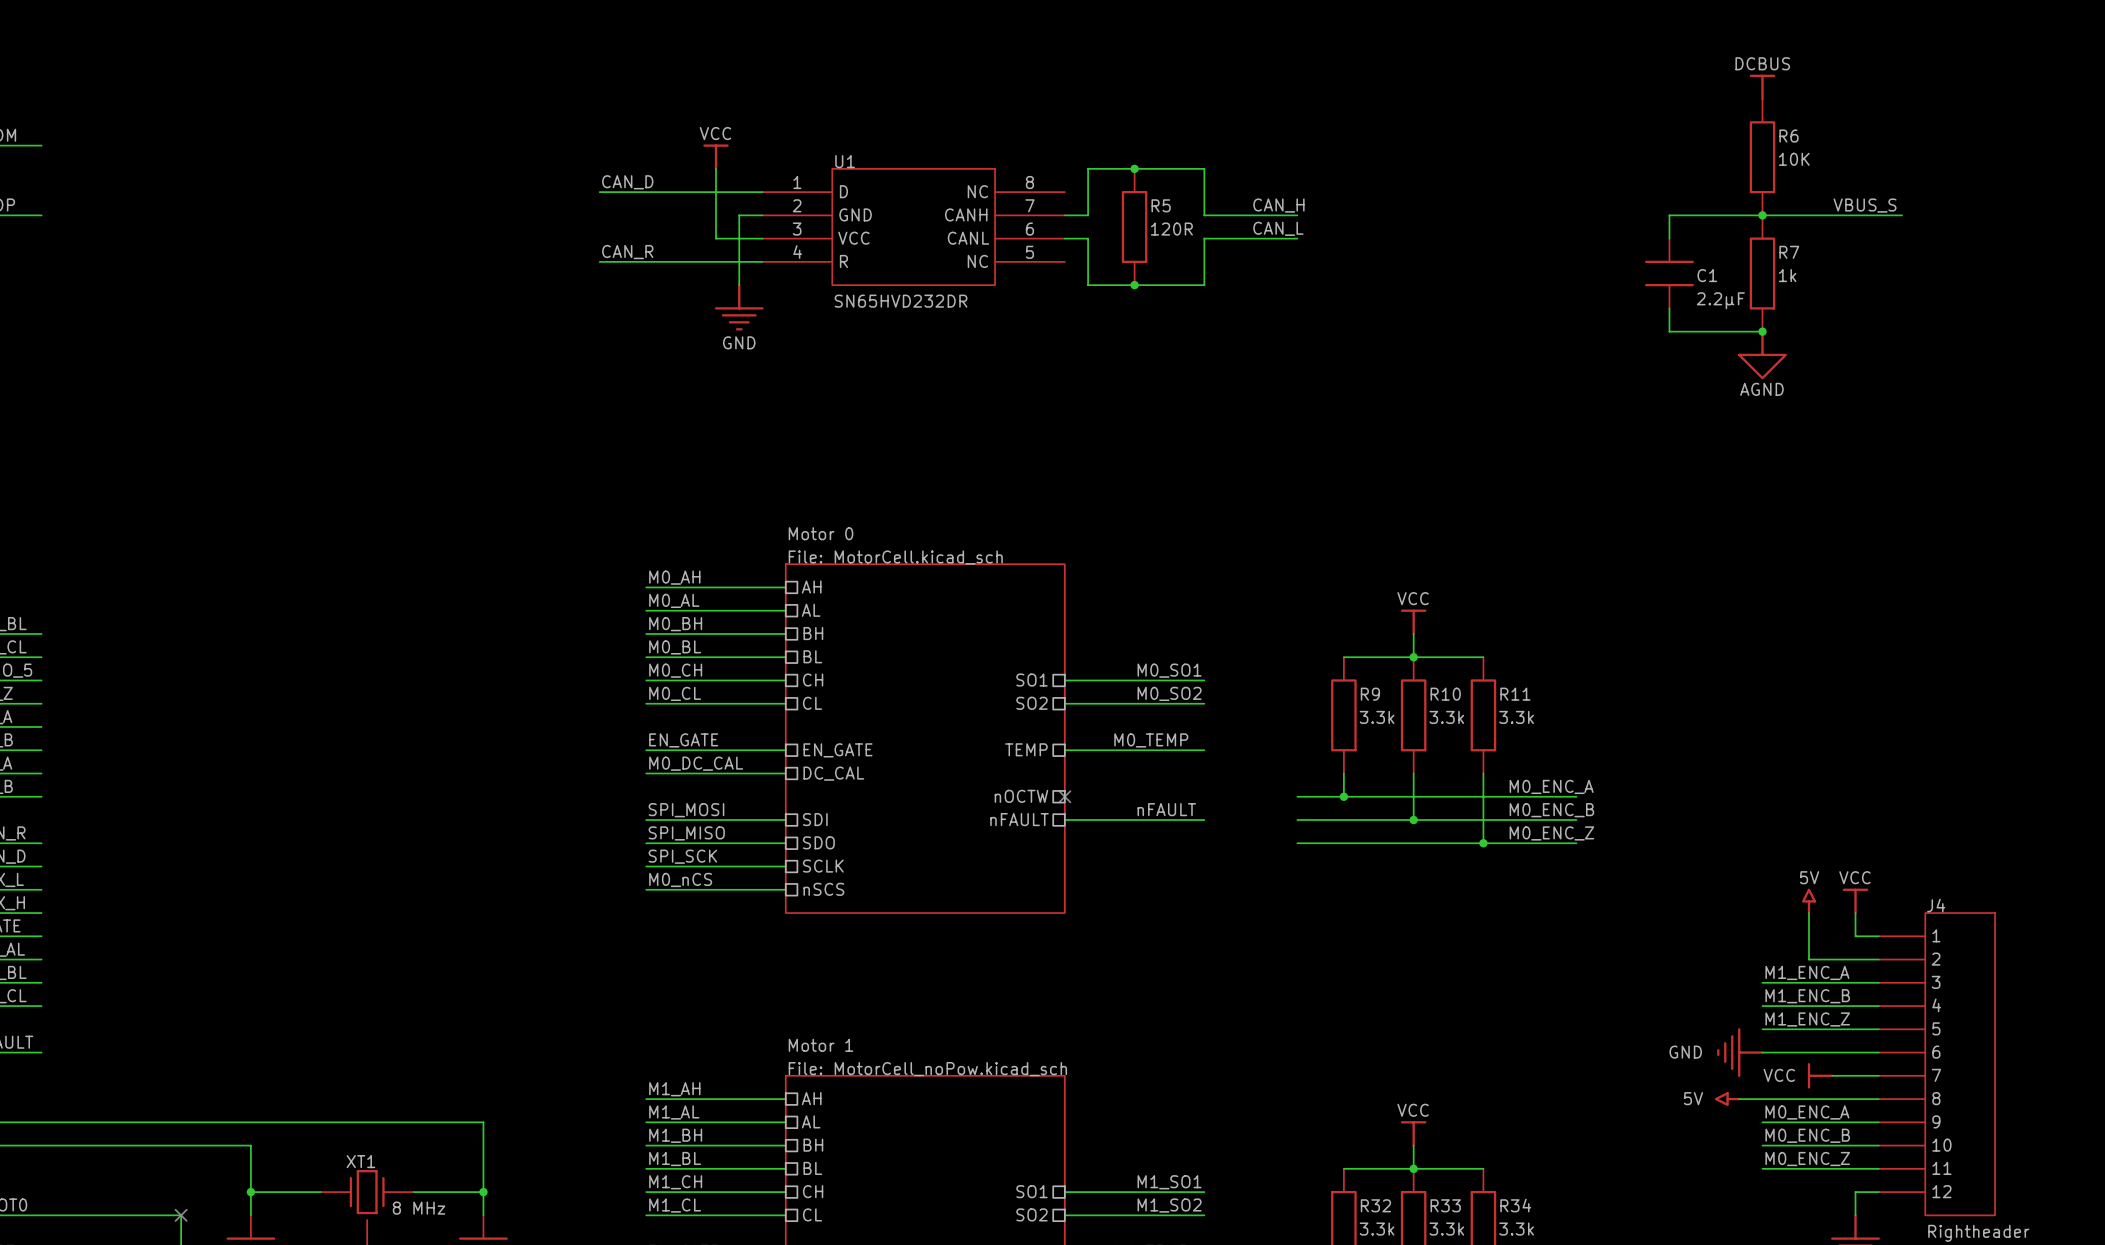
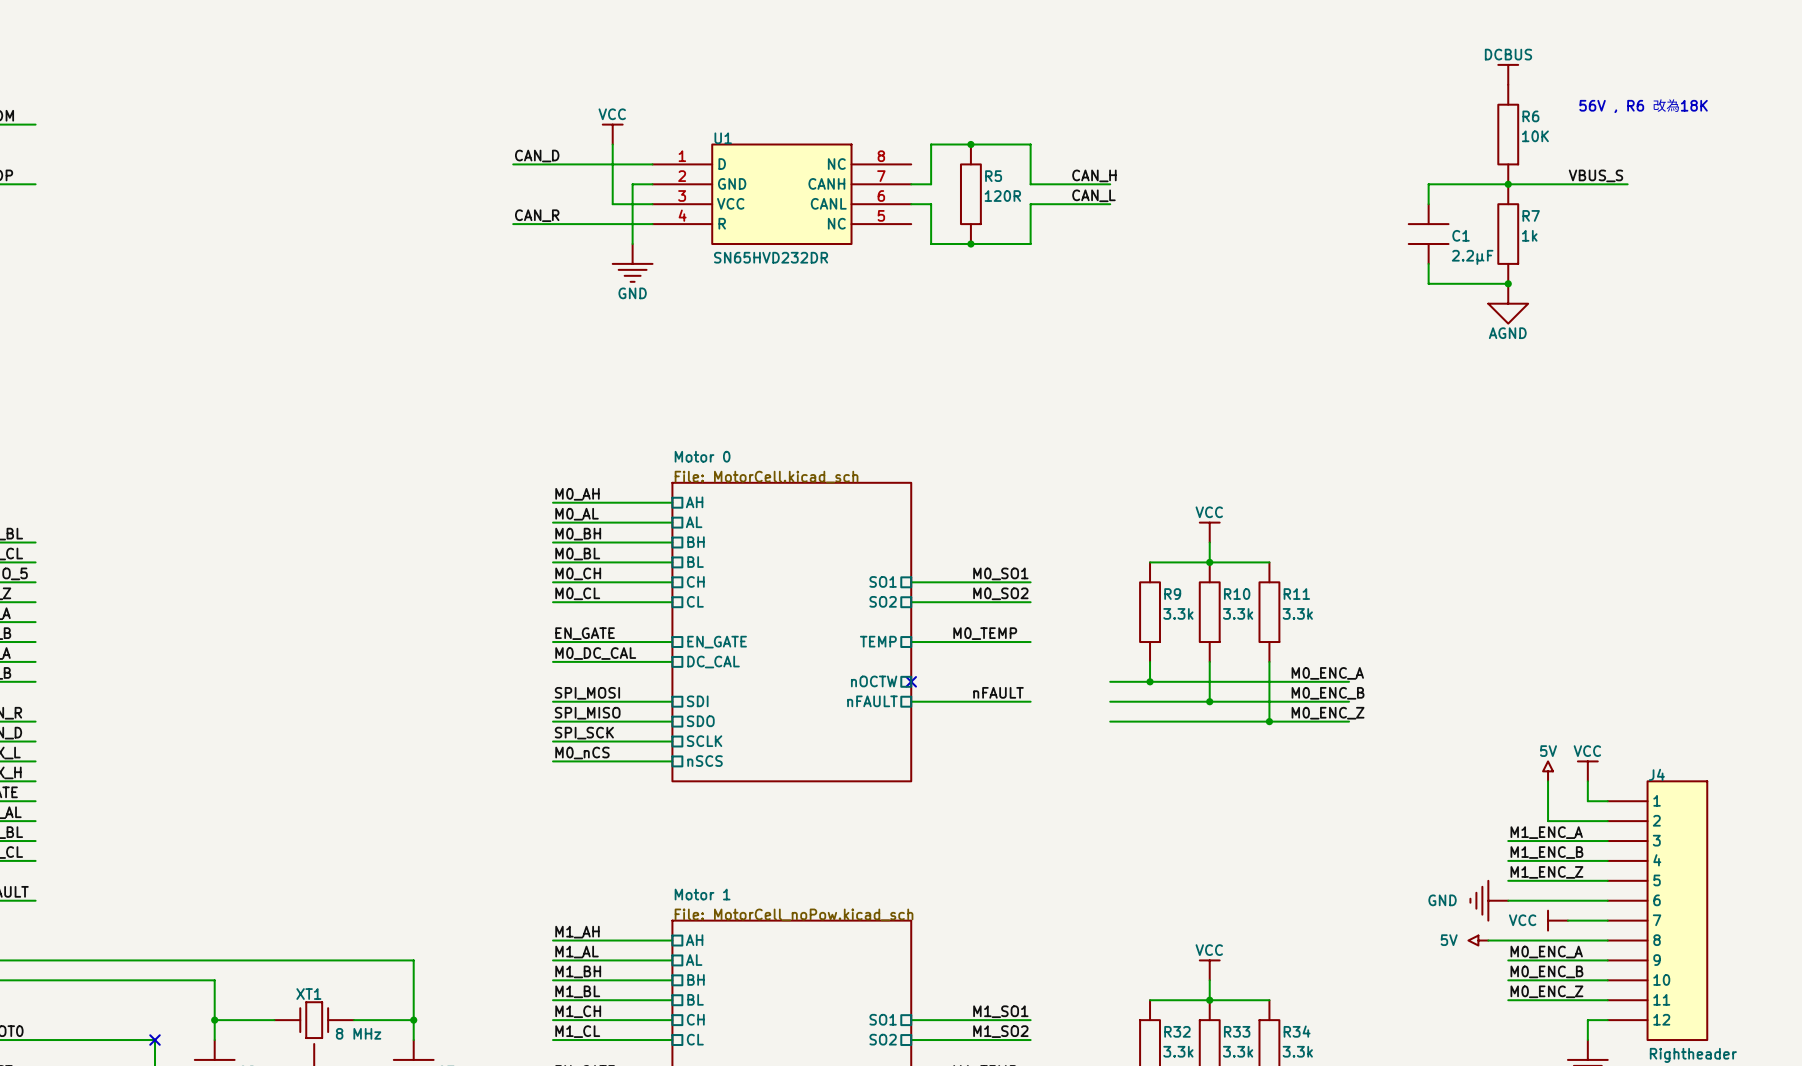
text: none -> 56V , R6 改為18K (1643, 105)

